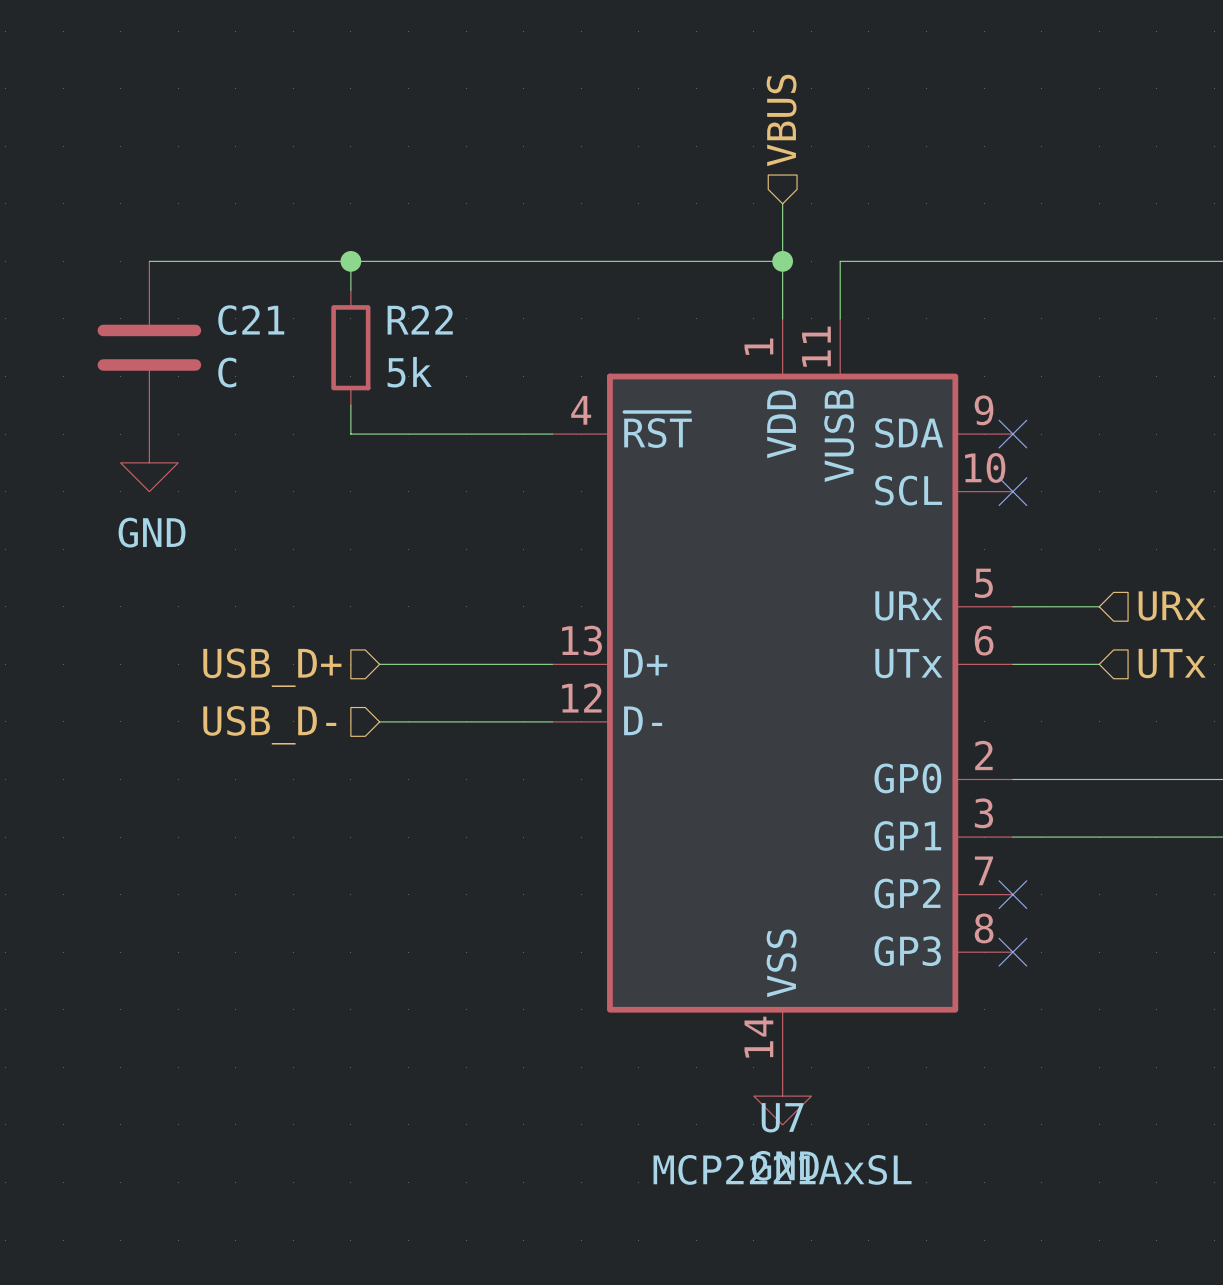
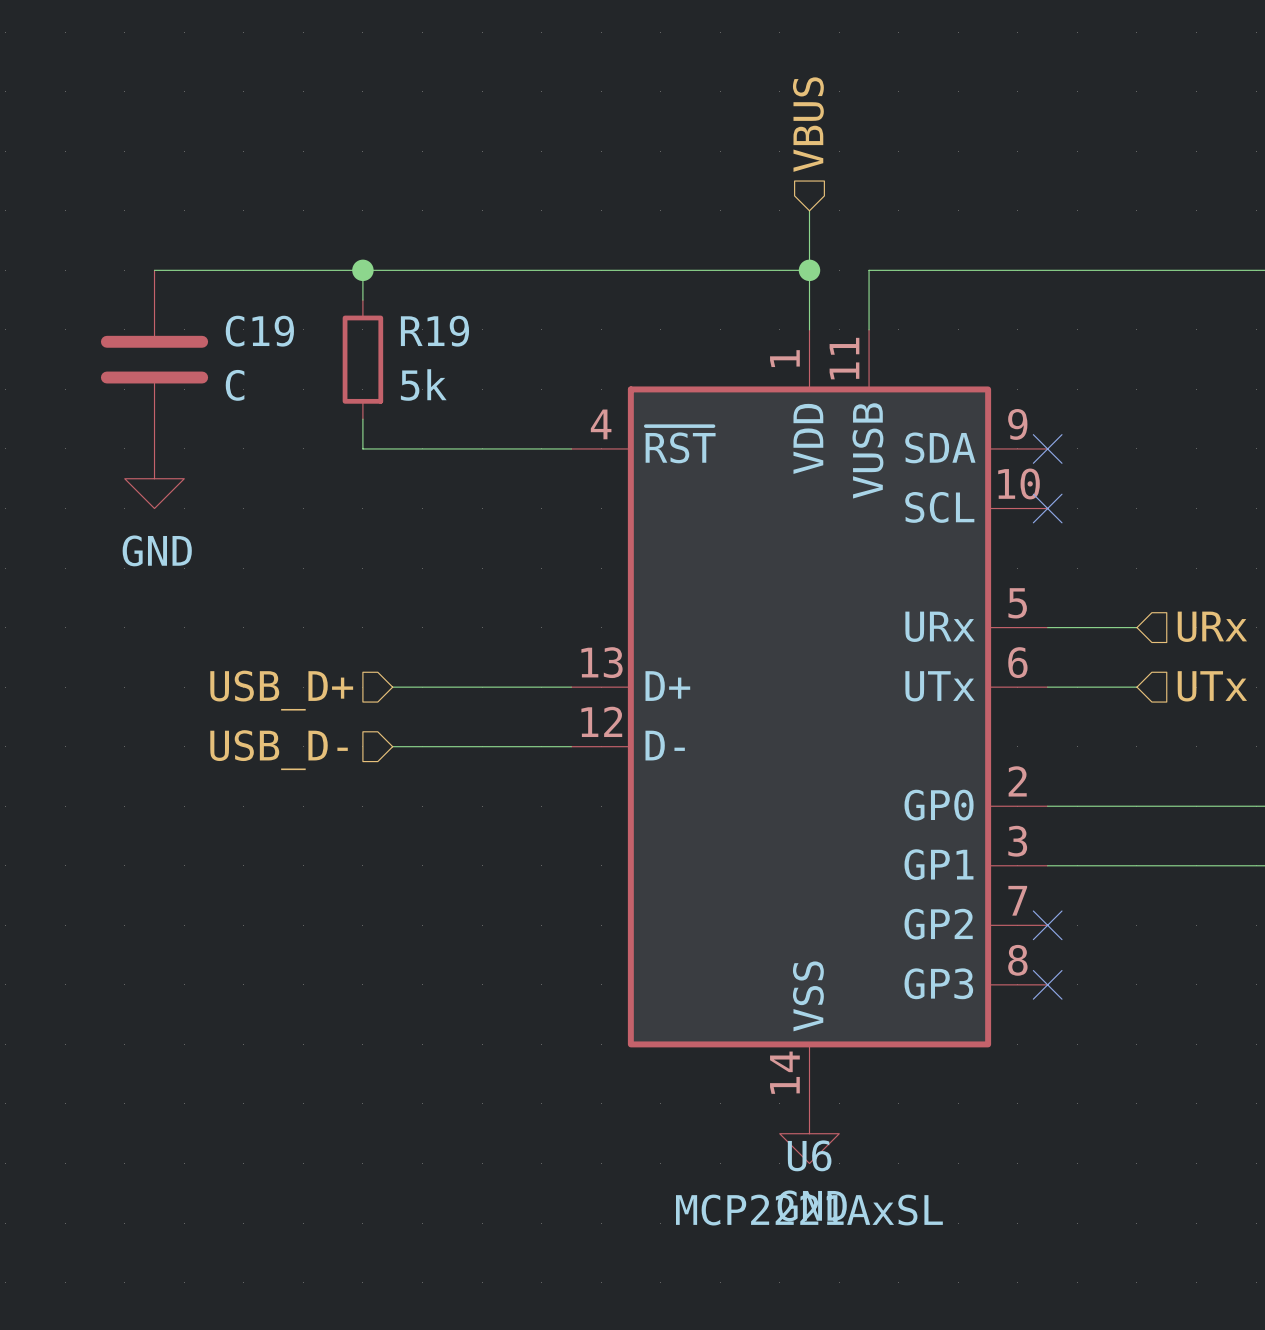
R22 name: R22 (420, 319) -> R19 (434, 331)
C21 name: C21 (251, 320) -> C19 (259, 331)
U7 name: U7 (782, 1117) -> U6 (809, 1155)

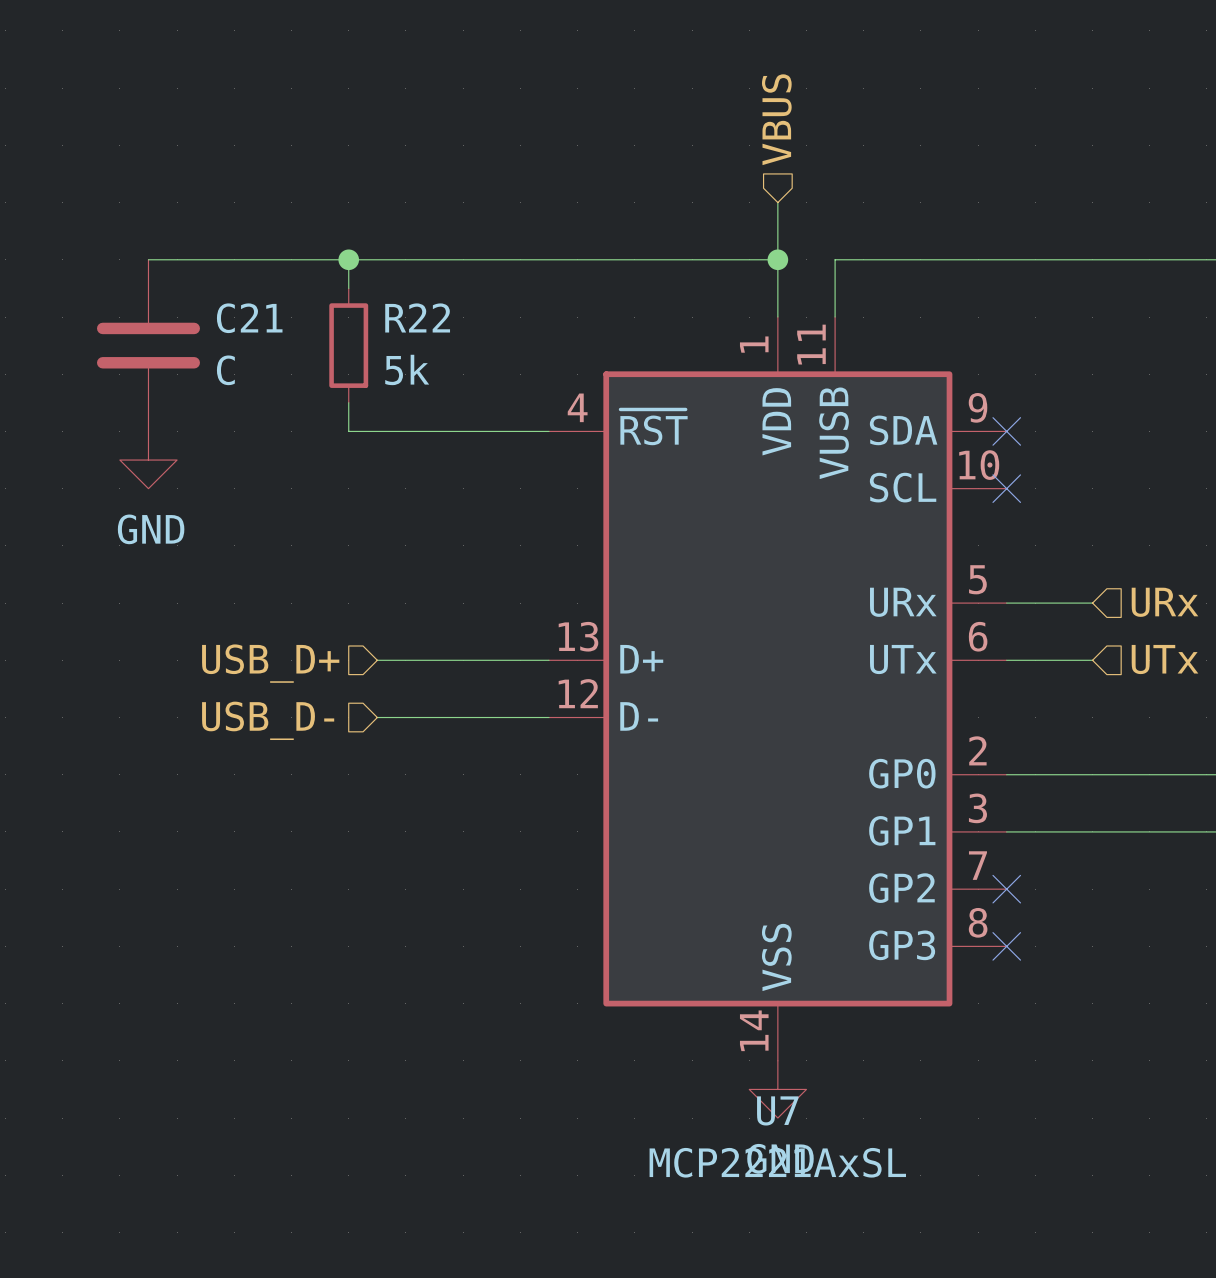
C19 name: C19 (259, 331) -> C21 (249, 318)
R19 name: R19 (434, 331) -> R22 (417, 317)
U6 name: U6 (809, 1155) -> U7 (777, 1110)

